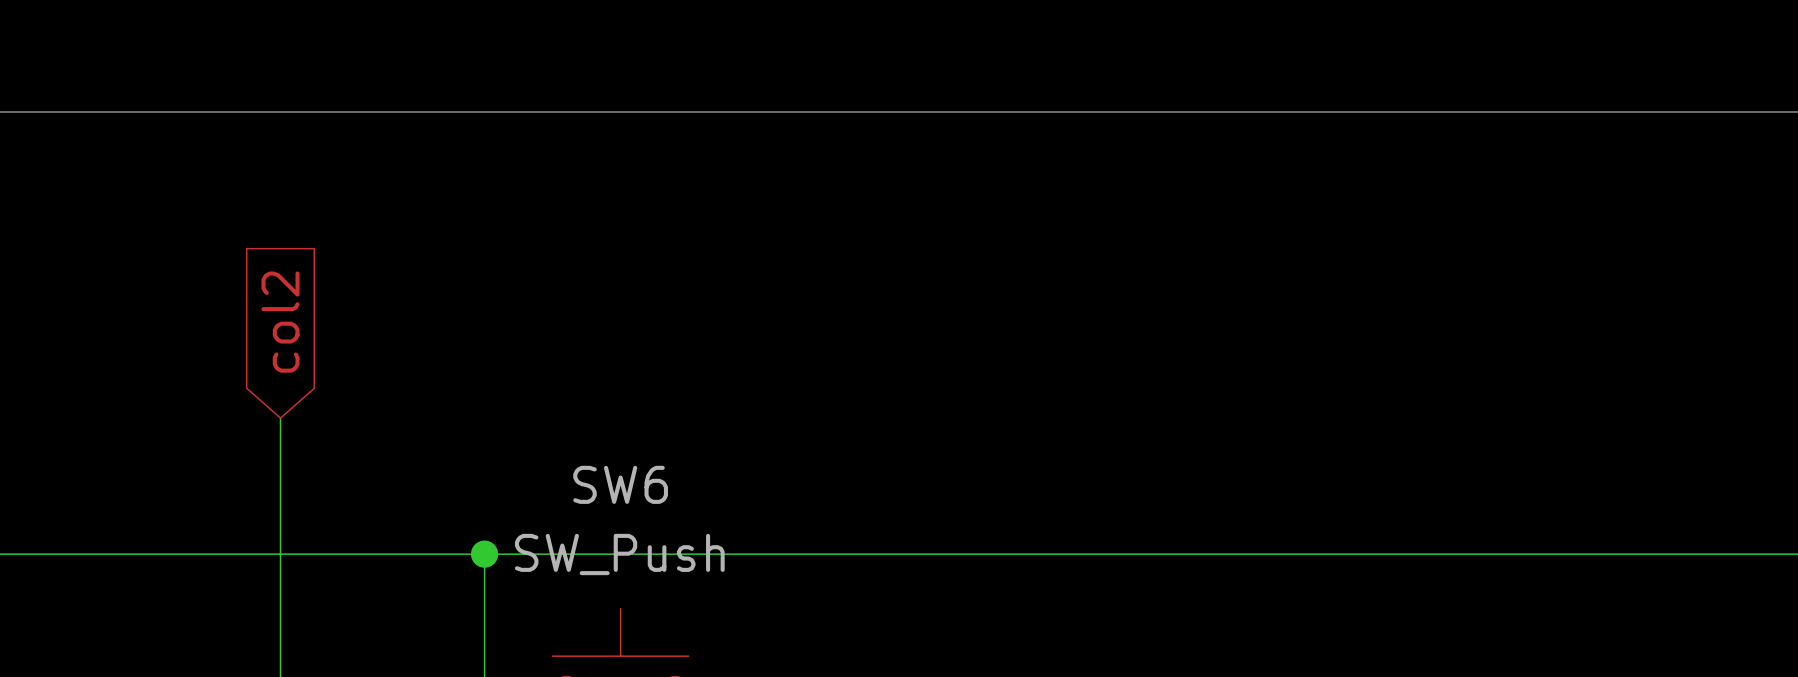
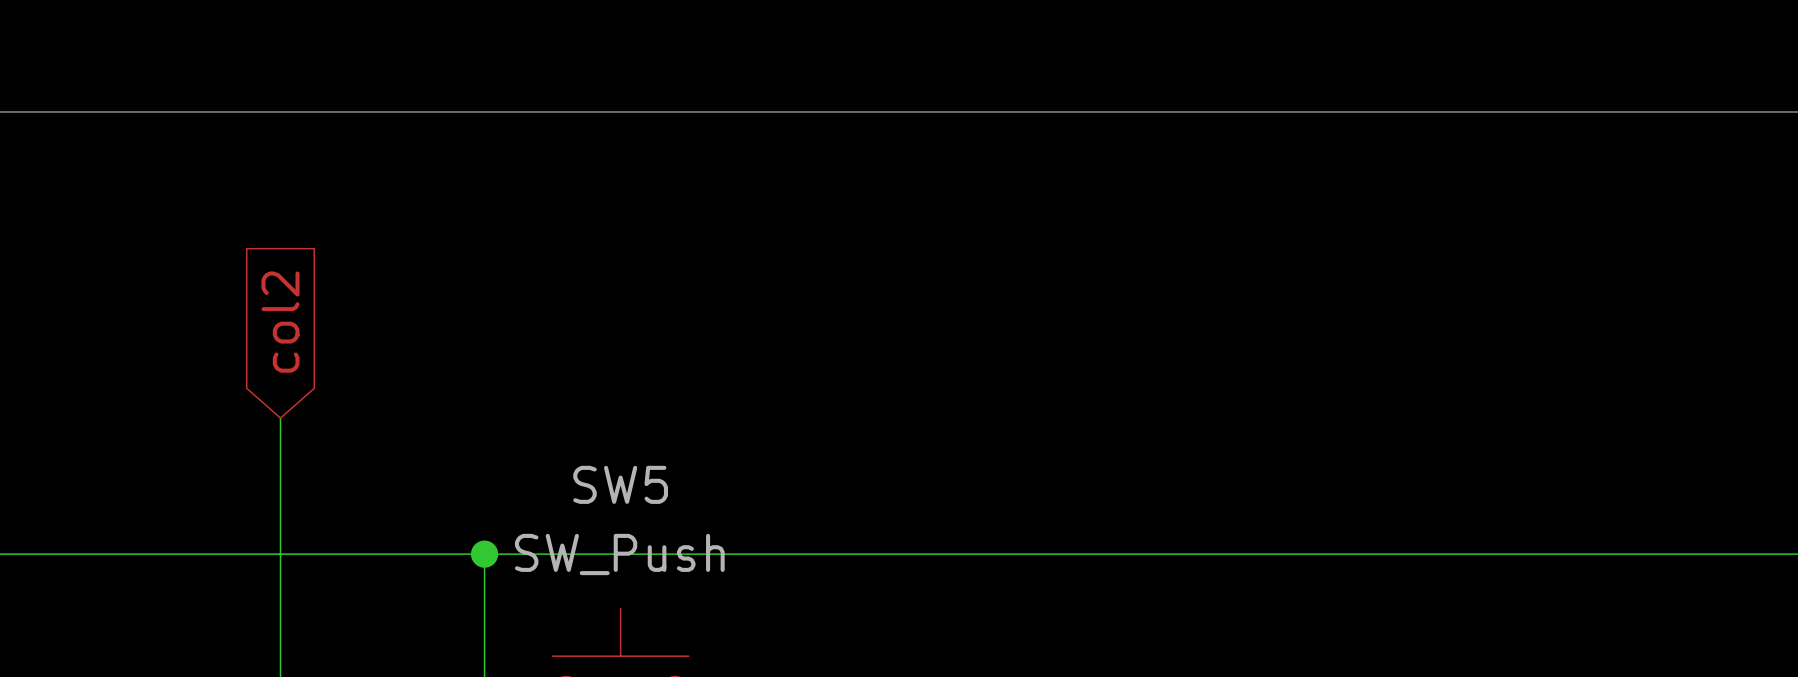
SW6 name: SW6 (620, 484) -> SW5 (620, 484)

